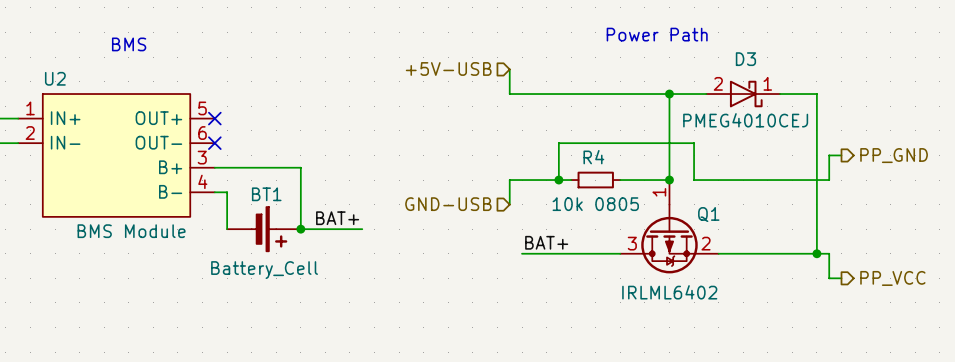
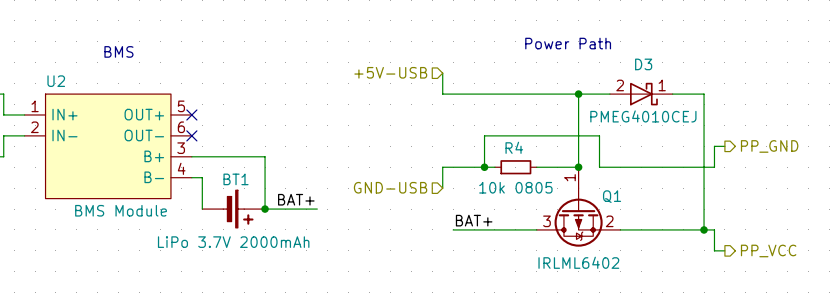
BT1 value: Battery_Cell (264, 270) -> LiPo 3.7V 2000mAh (233, 242)

